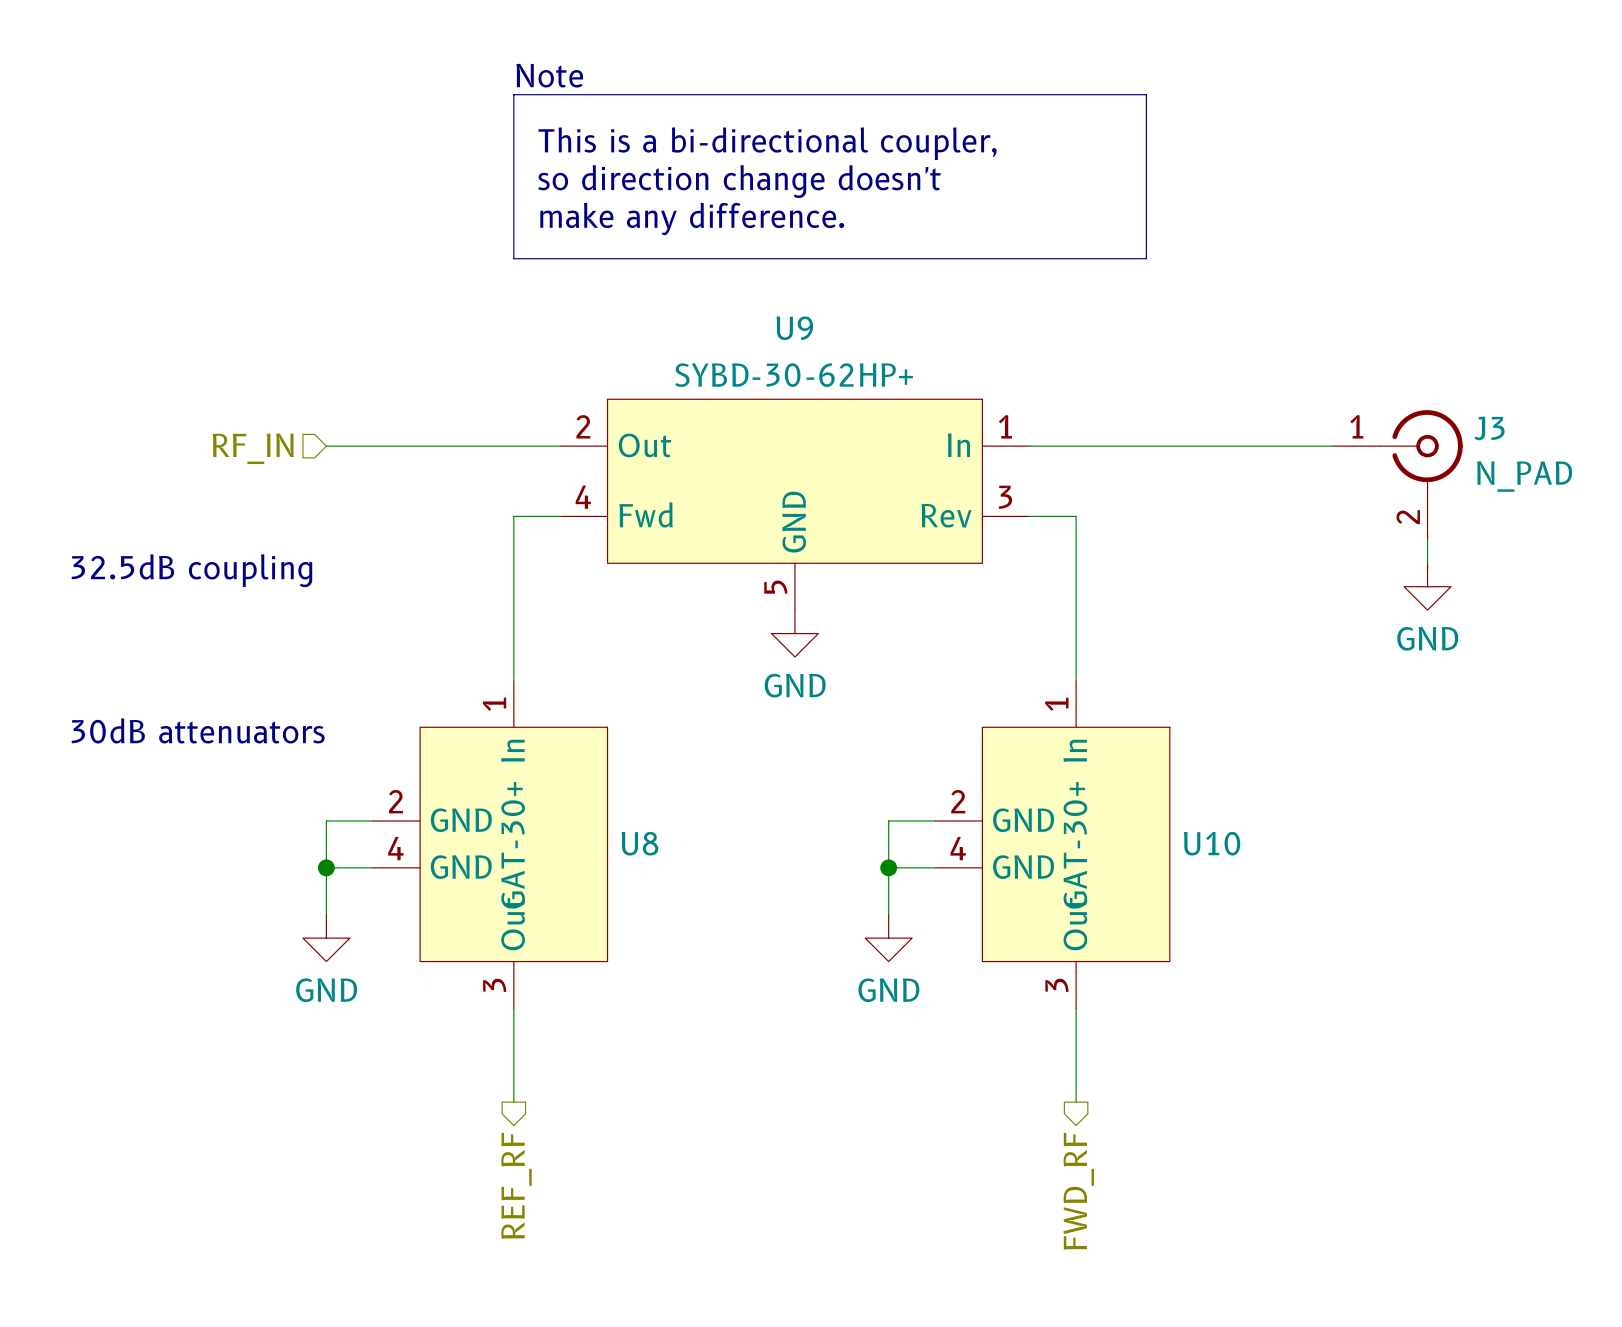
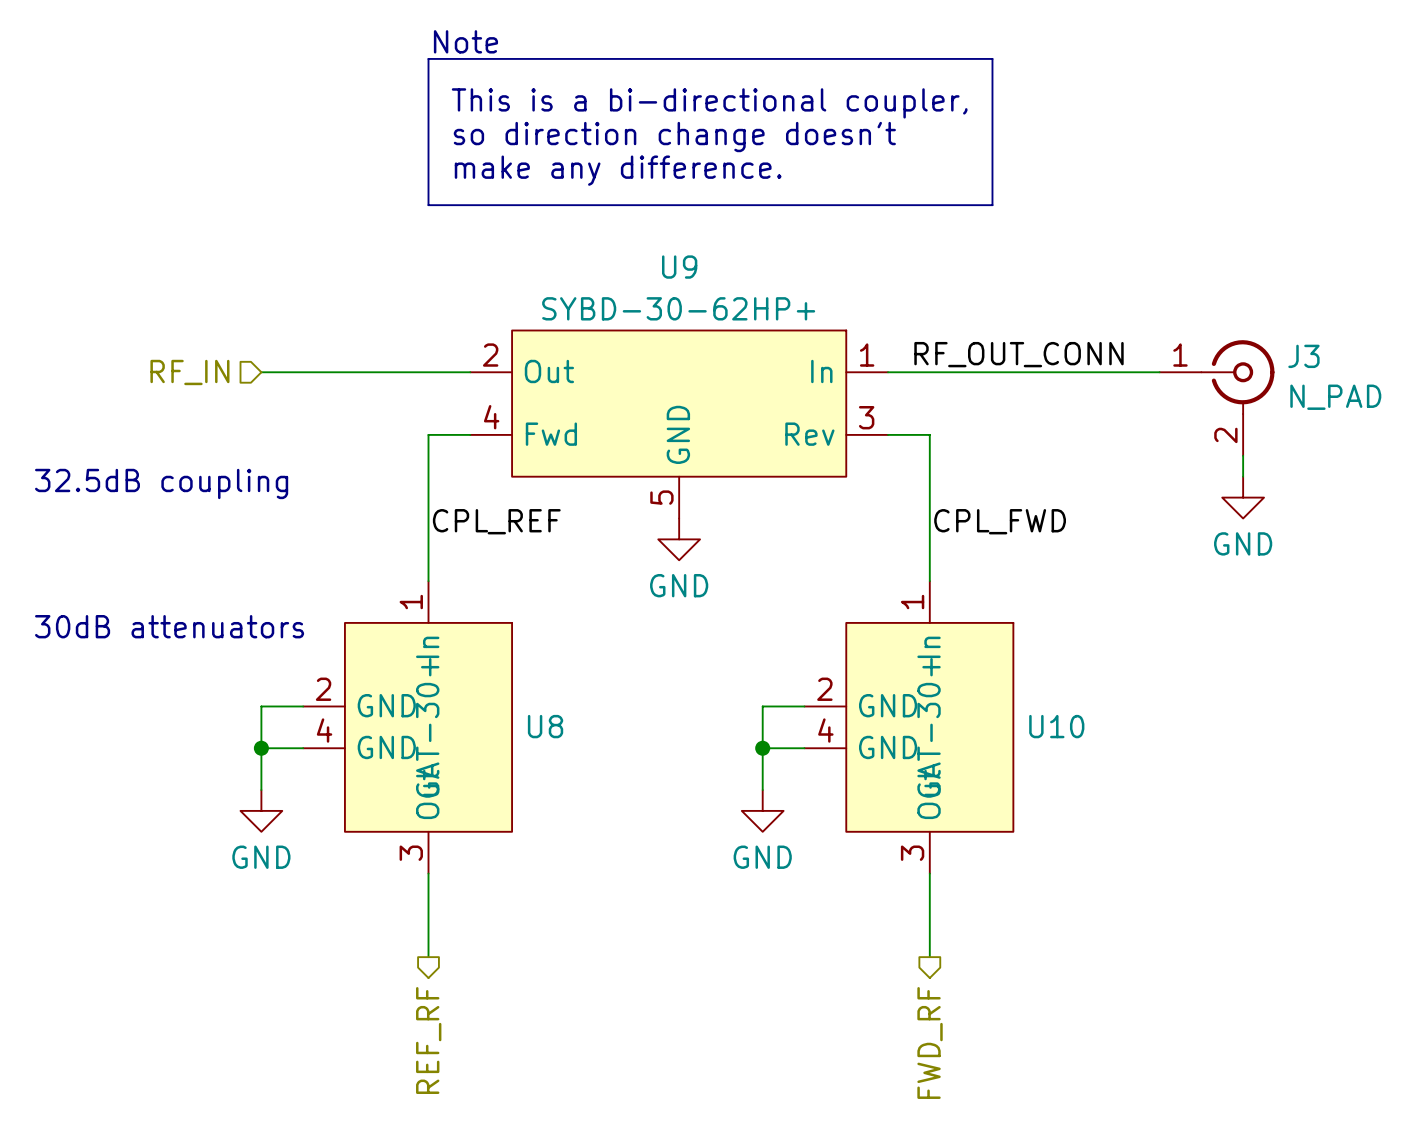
label: none -> RF_OUT_CONN (1018, 354)
label: none -> CPL_REF (496, 521)
label: none -> CPL_FWD (1000, 521)

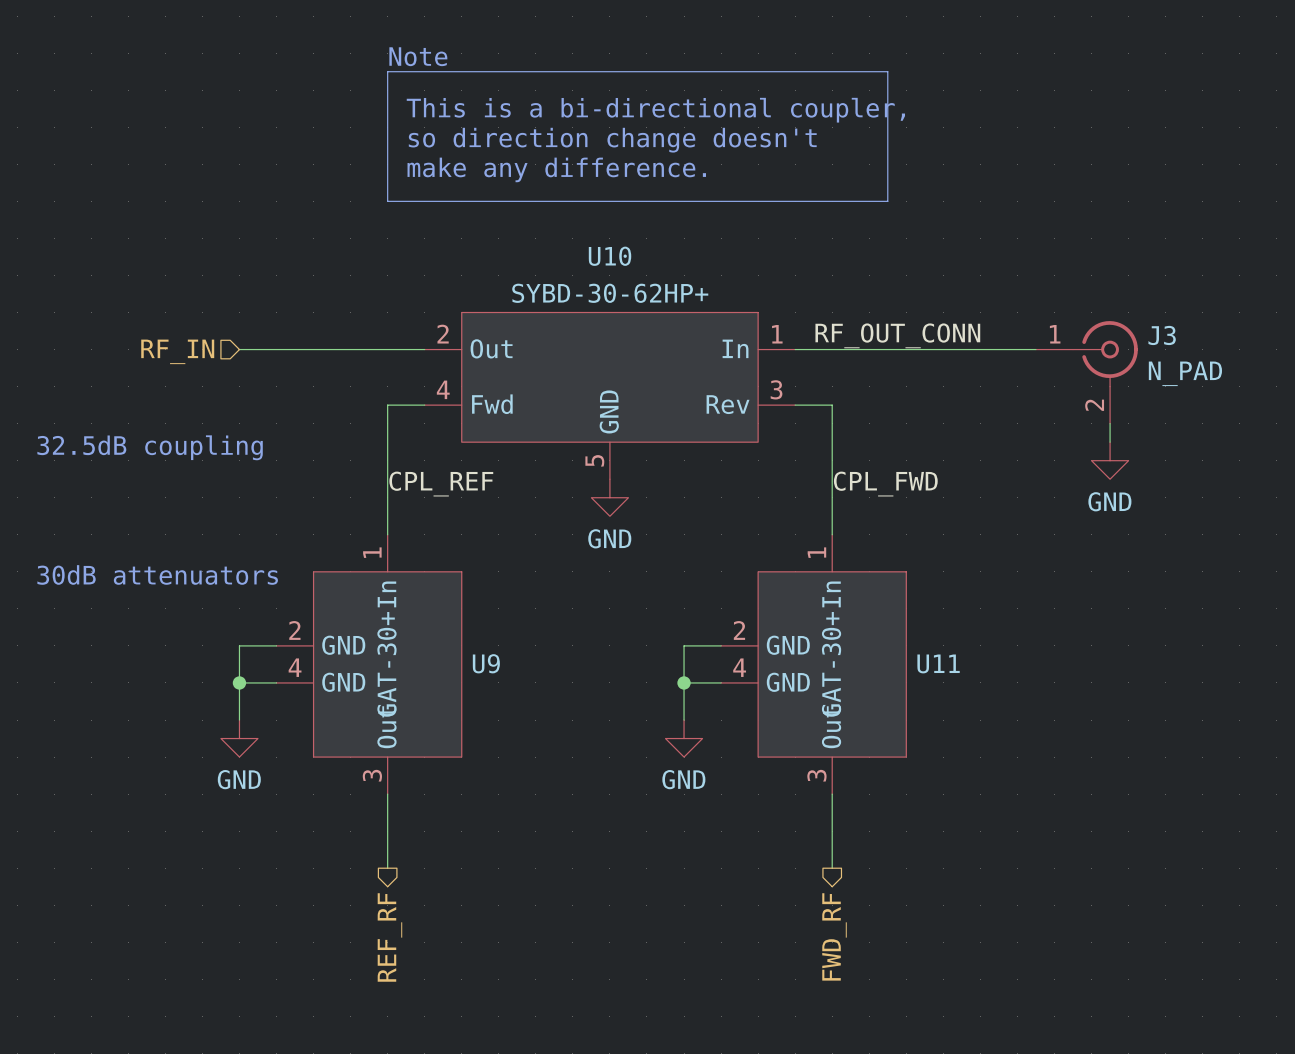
U9 name: U9 (679, 267) -> U10 (610, 256)
U8 name: U8 (545, 726) -> U9 (486, 663)
U10 name: U10 (1056, 726) -> U11 (938, 663)

